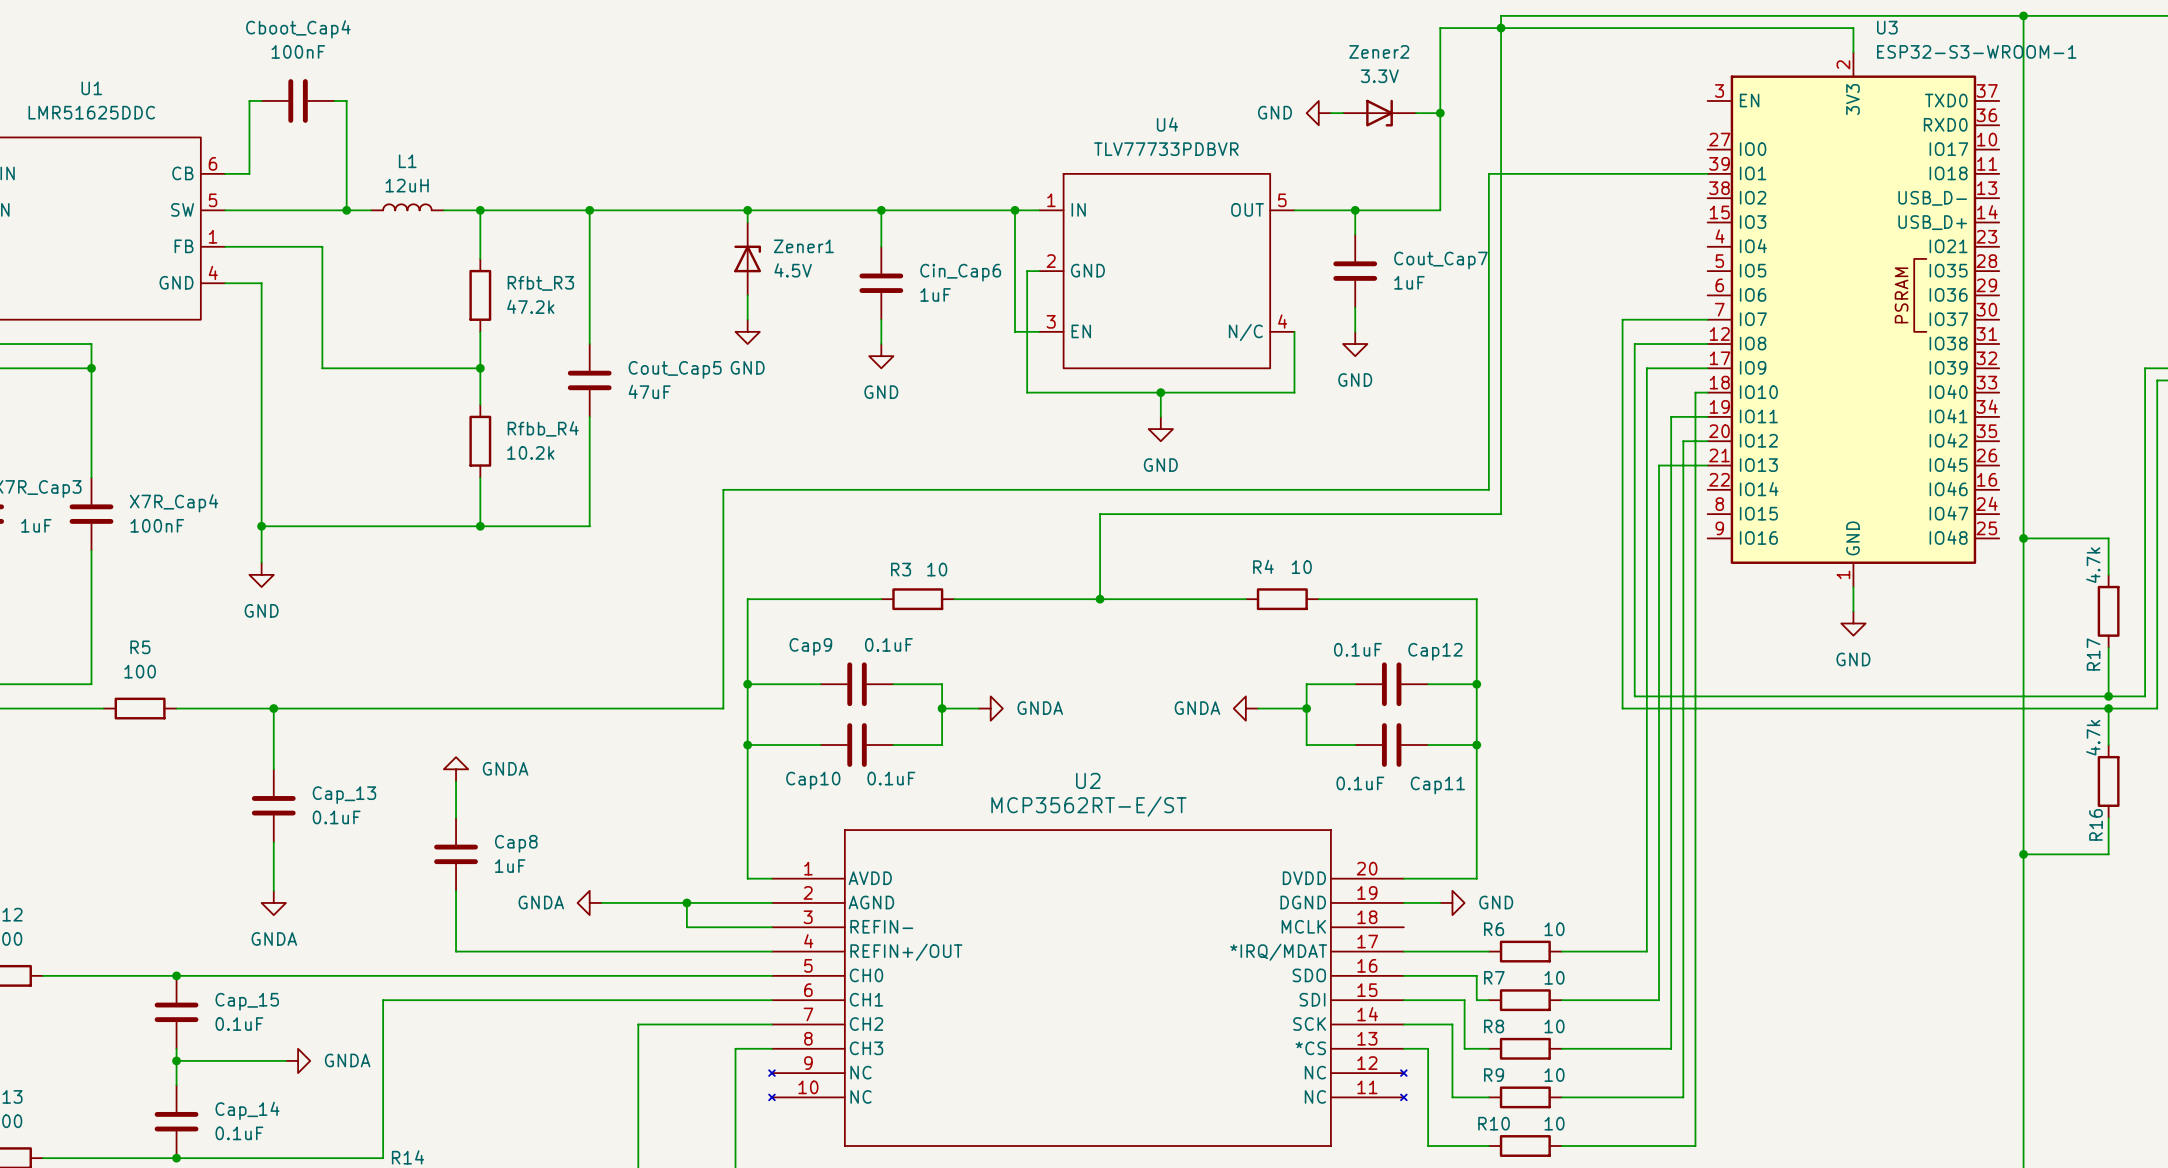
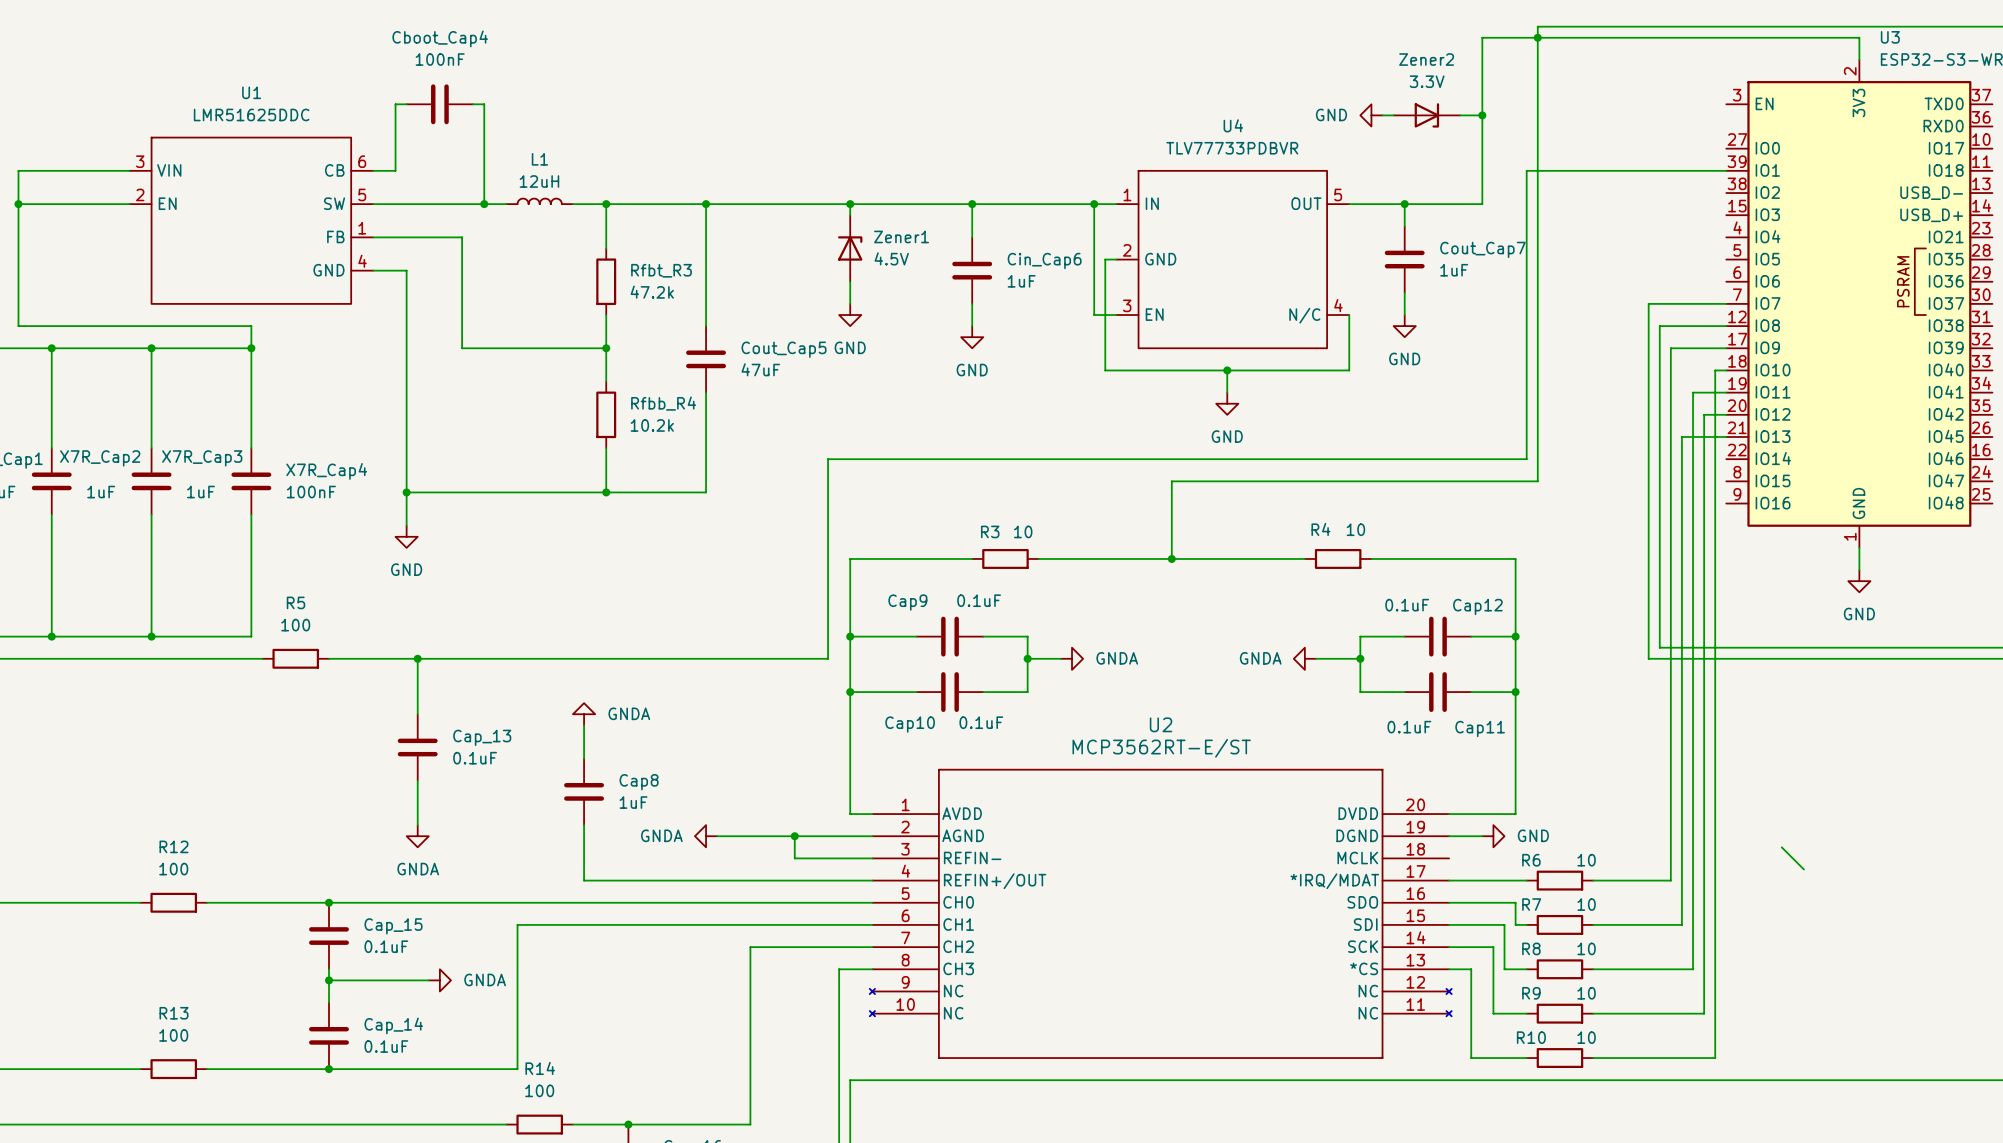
wire: none -> (1781, 847) (1803, 869)

